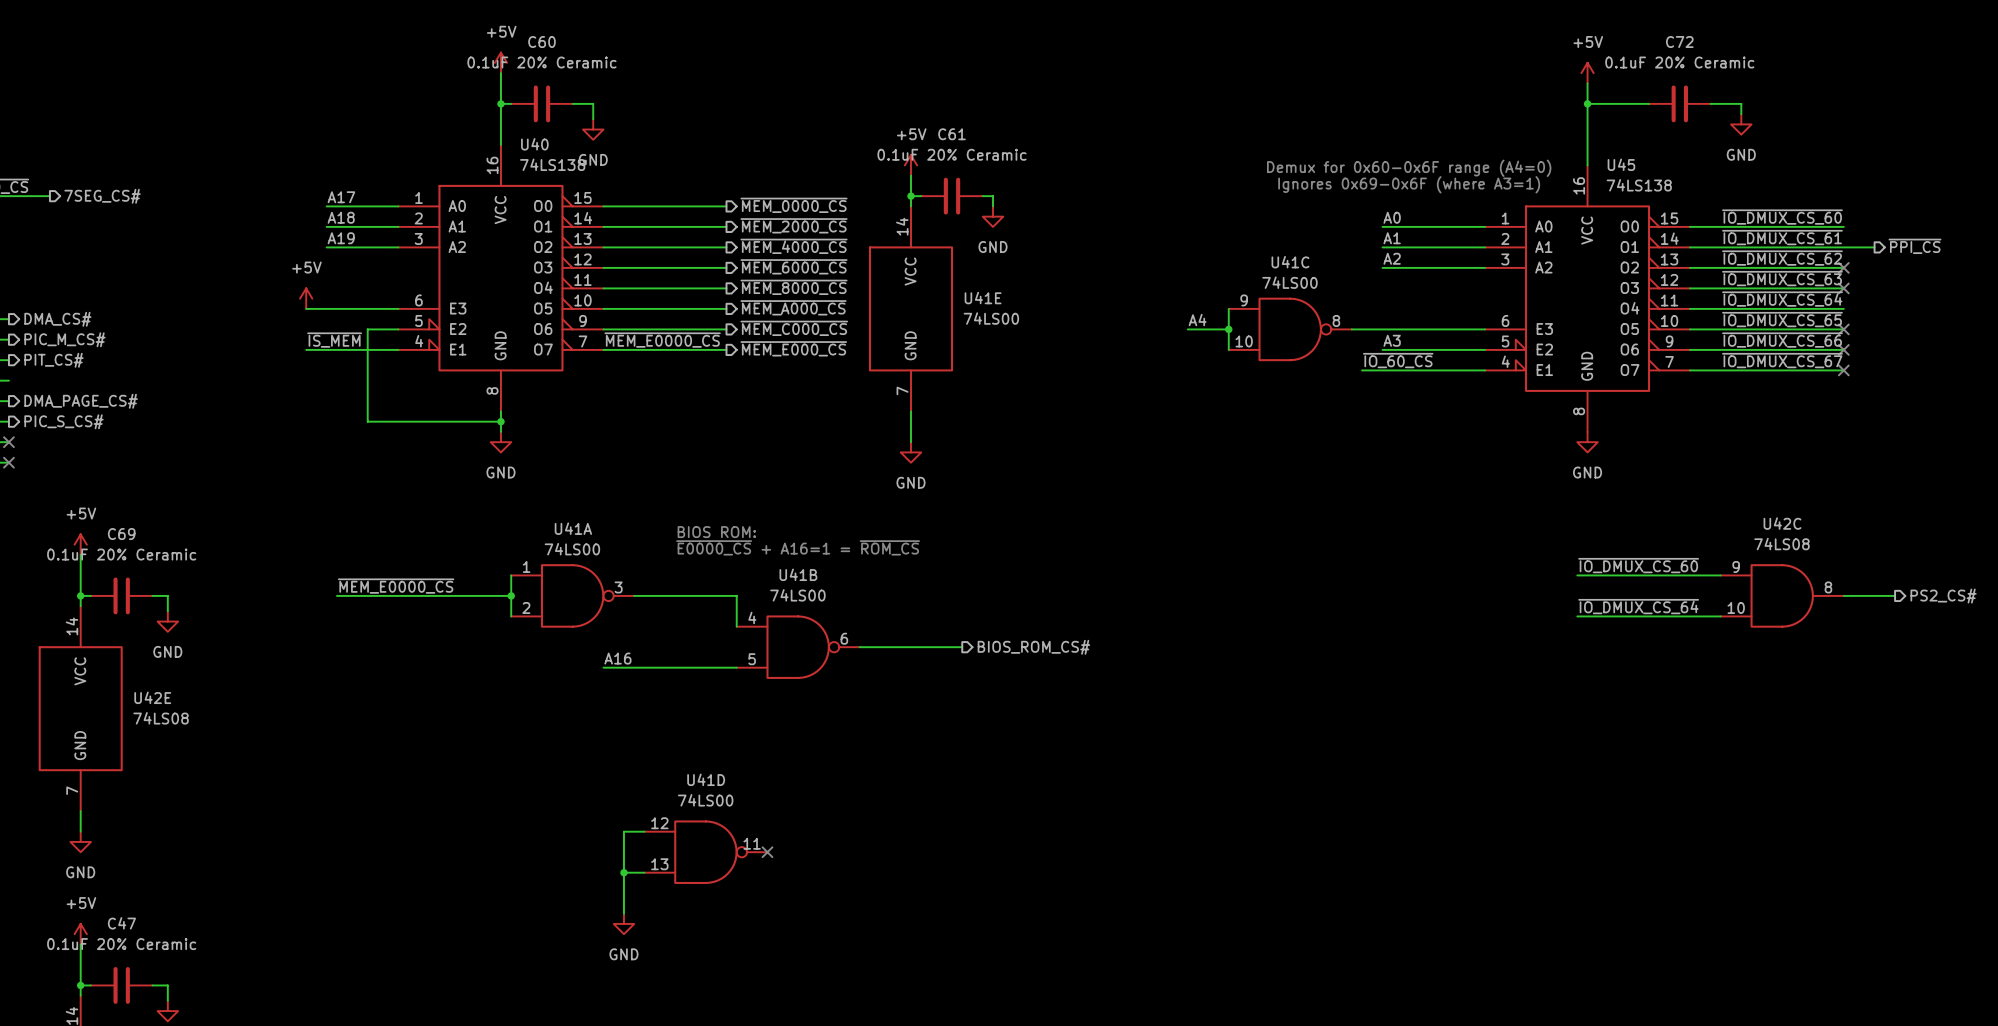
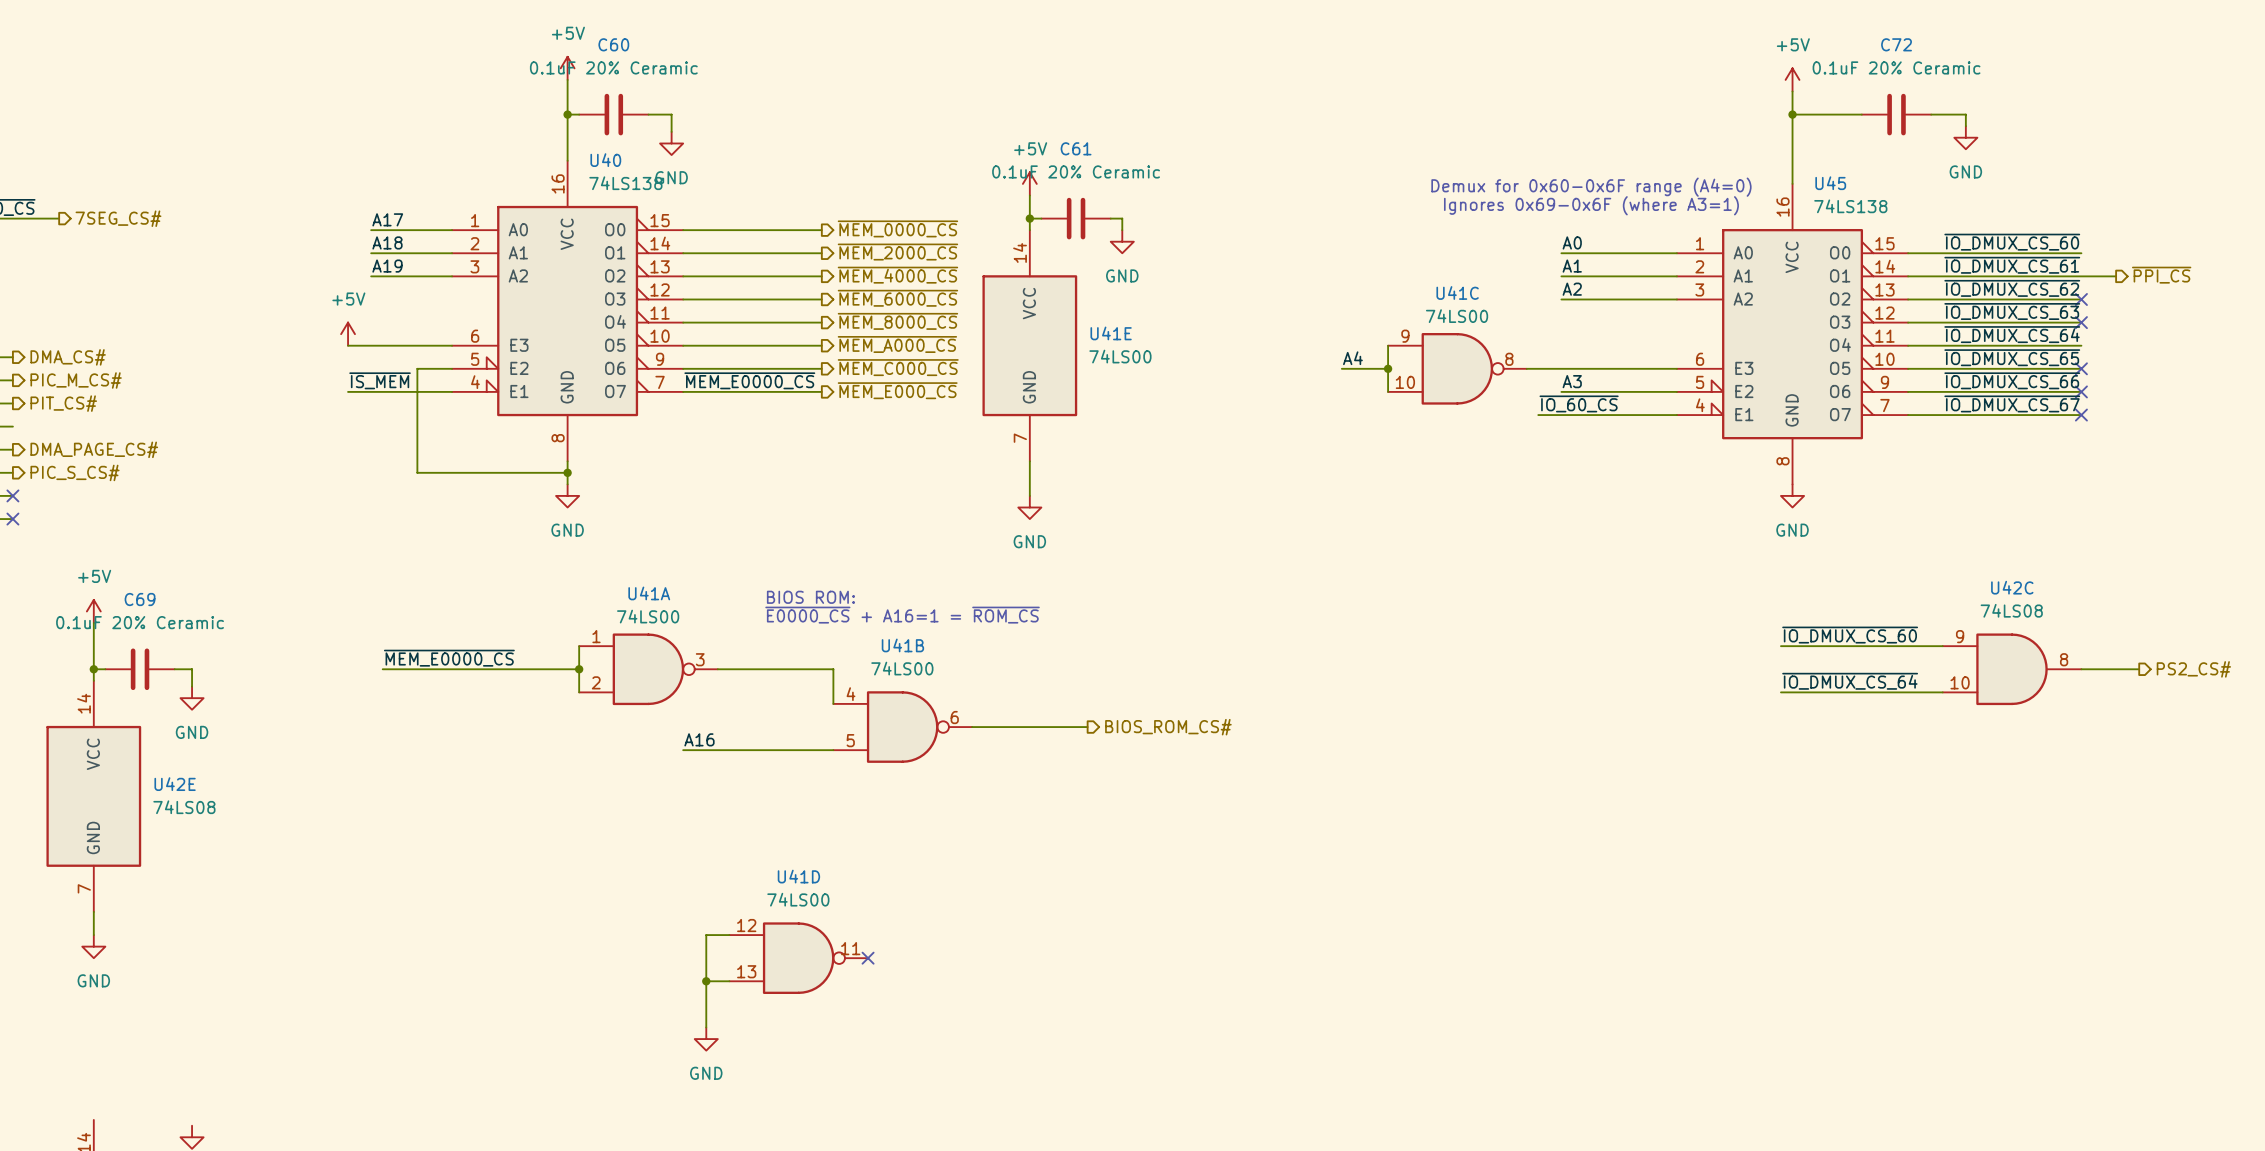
power symbol: +5V (80, 934) -> none
wire: (80, 944) (80, 995) -> none
wire: (80, 985) (90, 985) -> none
junction: (80, 985) -> none
C47: 0.1uF 20% Ceramic (121, 985) -> none
wire: (152, 985) (167, 985) (167, 1000) -> none

